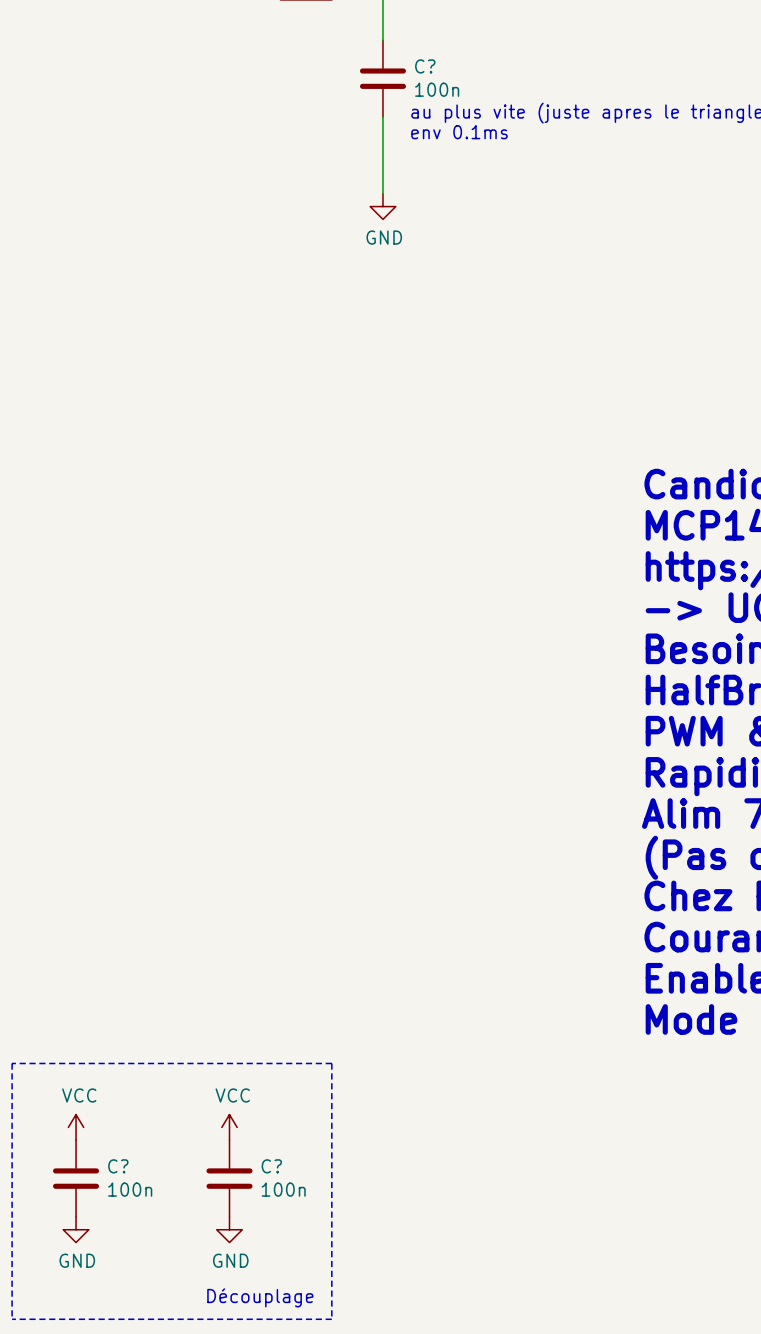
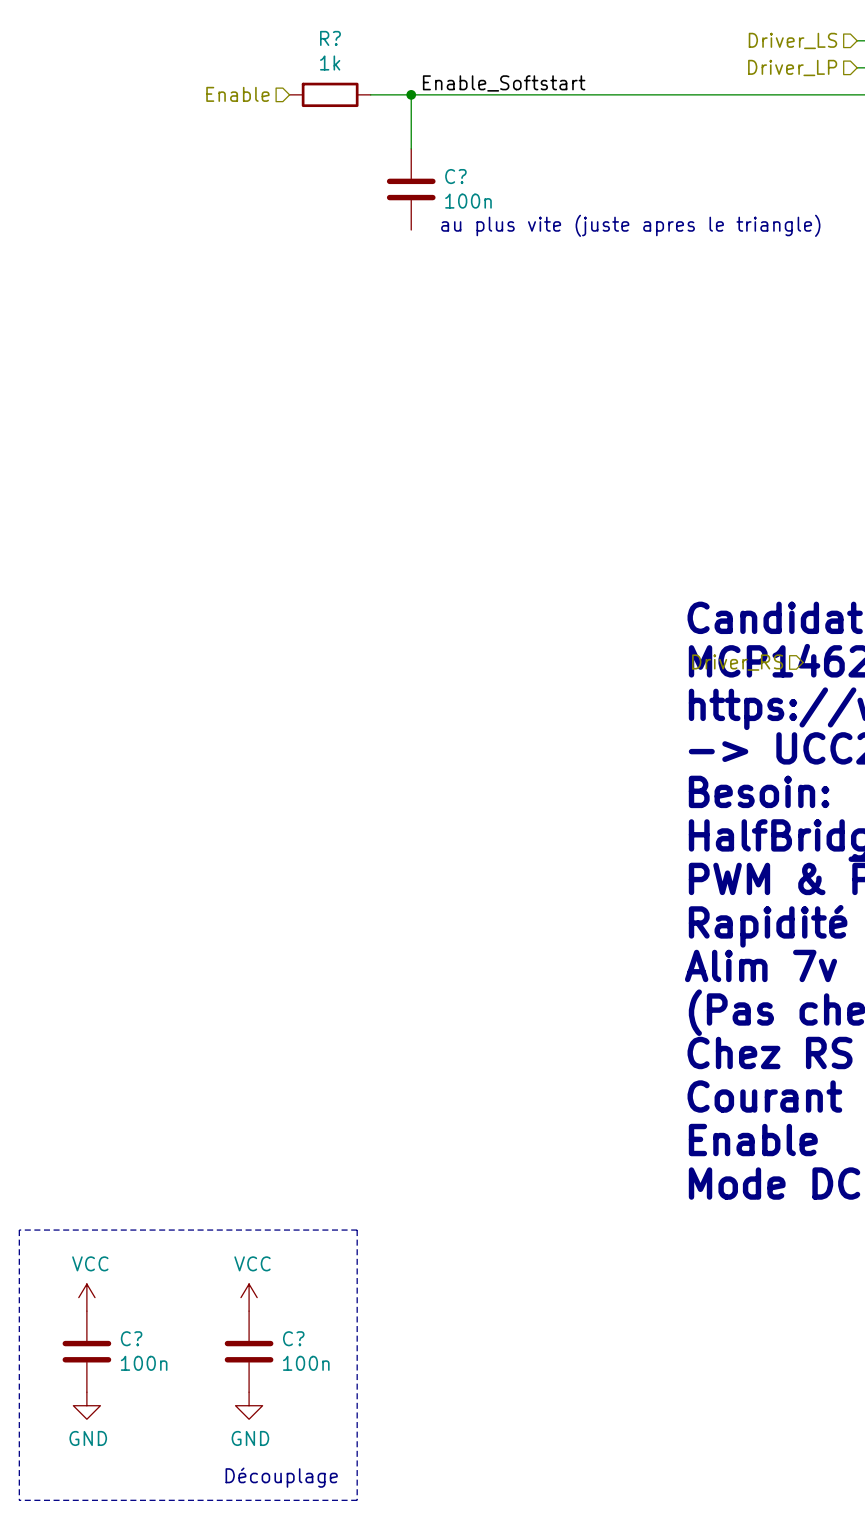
wire: (382, 117) (382, 193) -> none
text: env 0.1ms (459, 132) -> none
power symbol: GND (382, 206) -> none
hierarchical label: none -> Driver_RS (737, 662)

